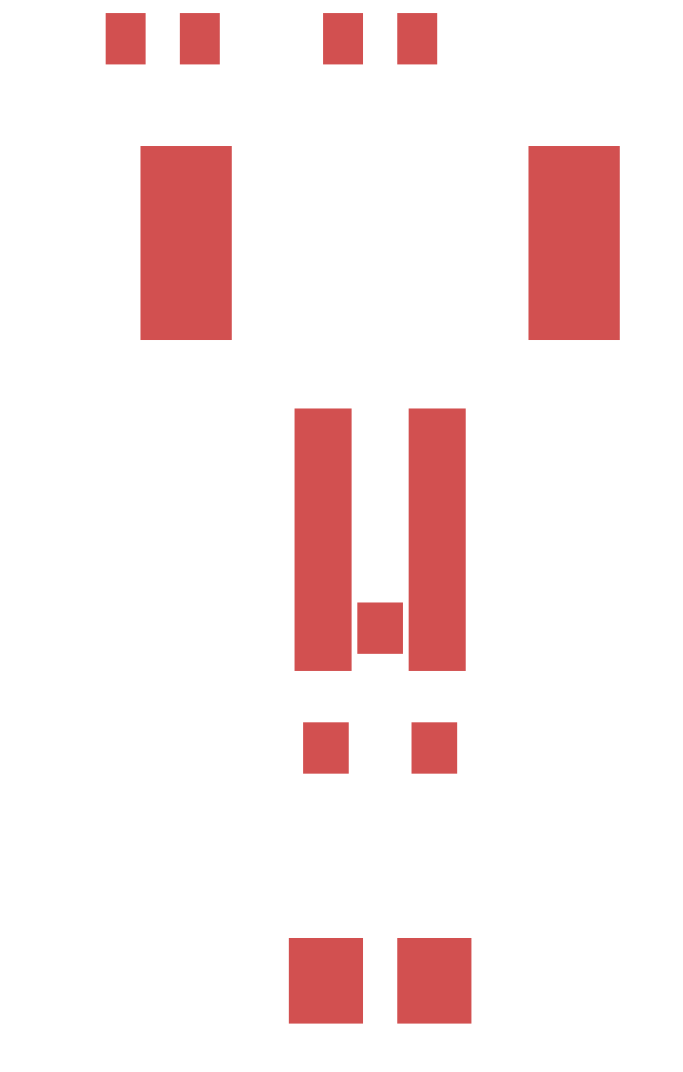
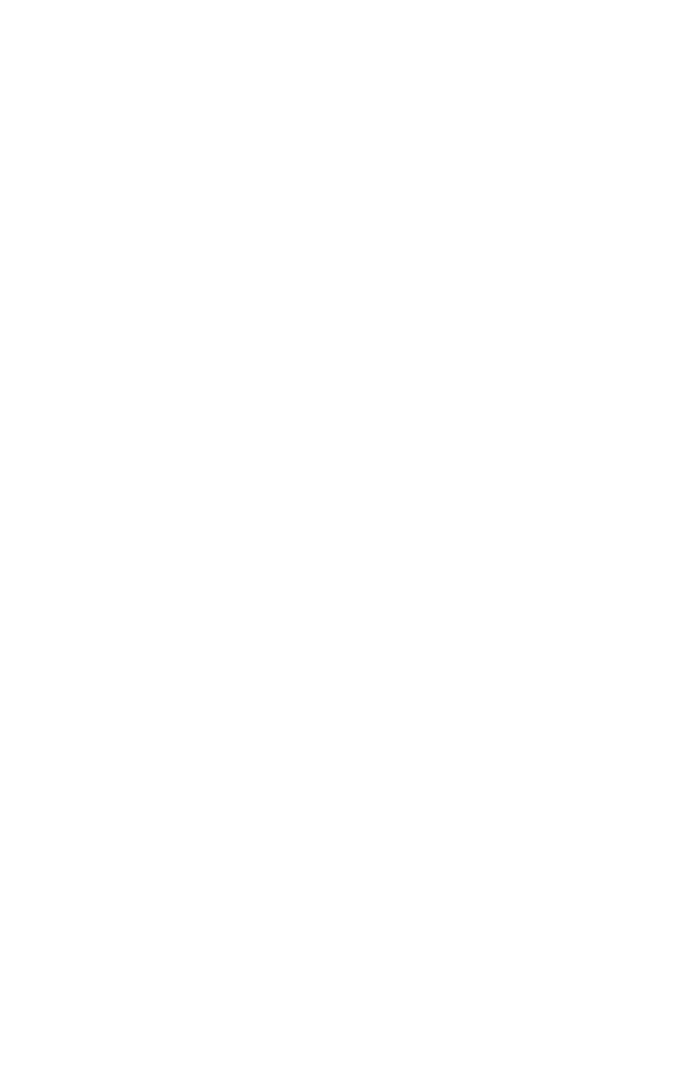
part: (162, 38) -> none
part: (380, 38) -> none
part: (380, 408) -> none
part: (380, 688) -> none
part: (380, 980) -> none

